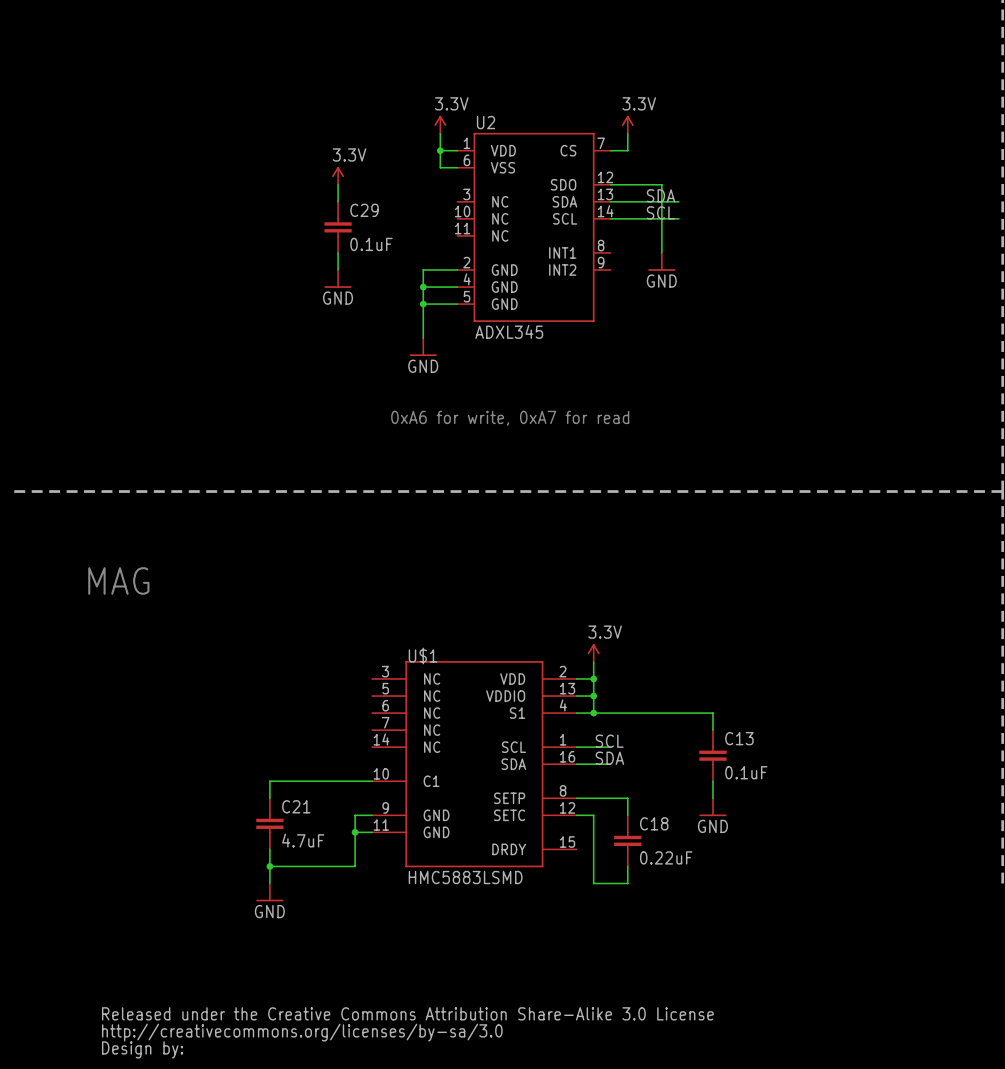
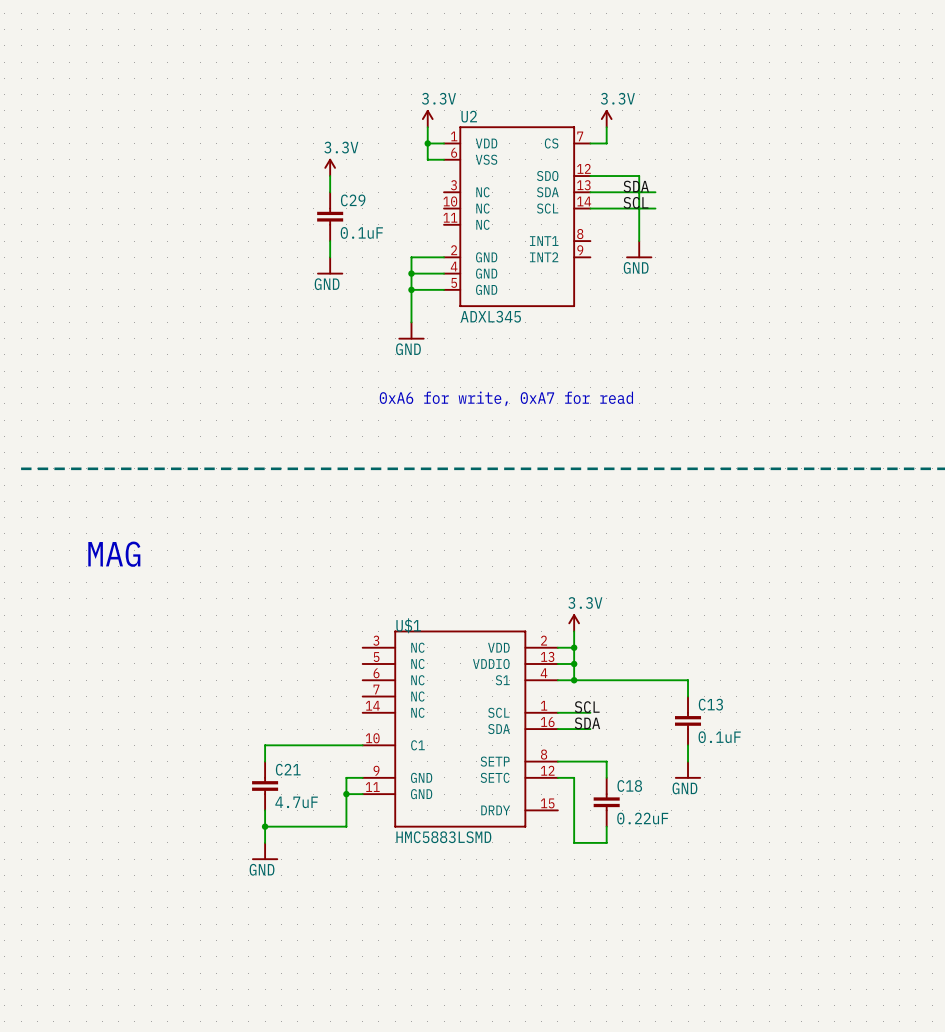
part: (407, 1032) -> none

